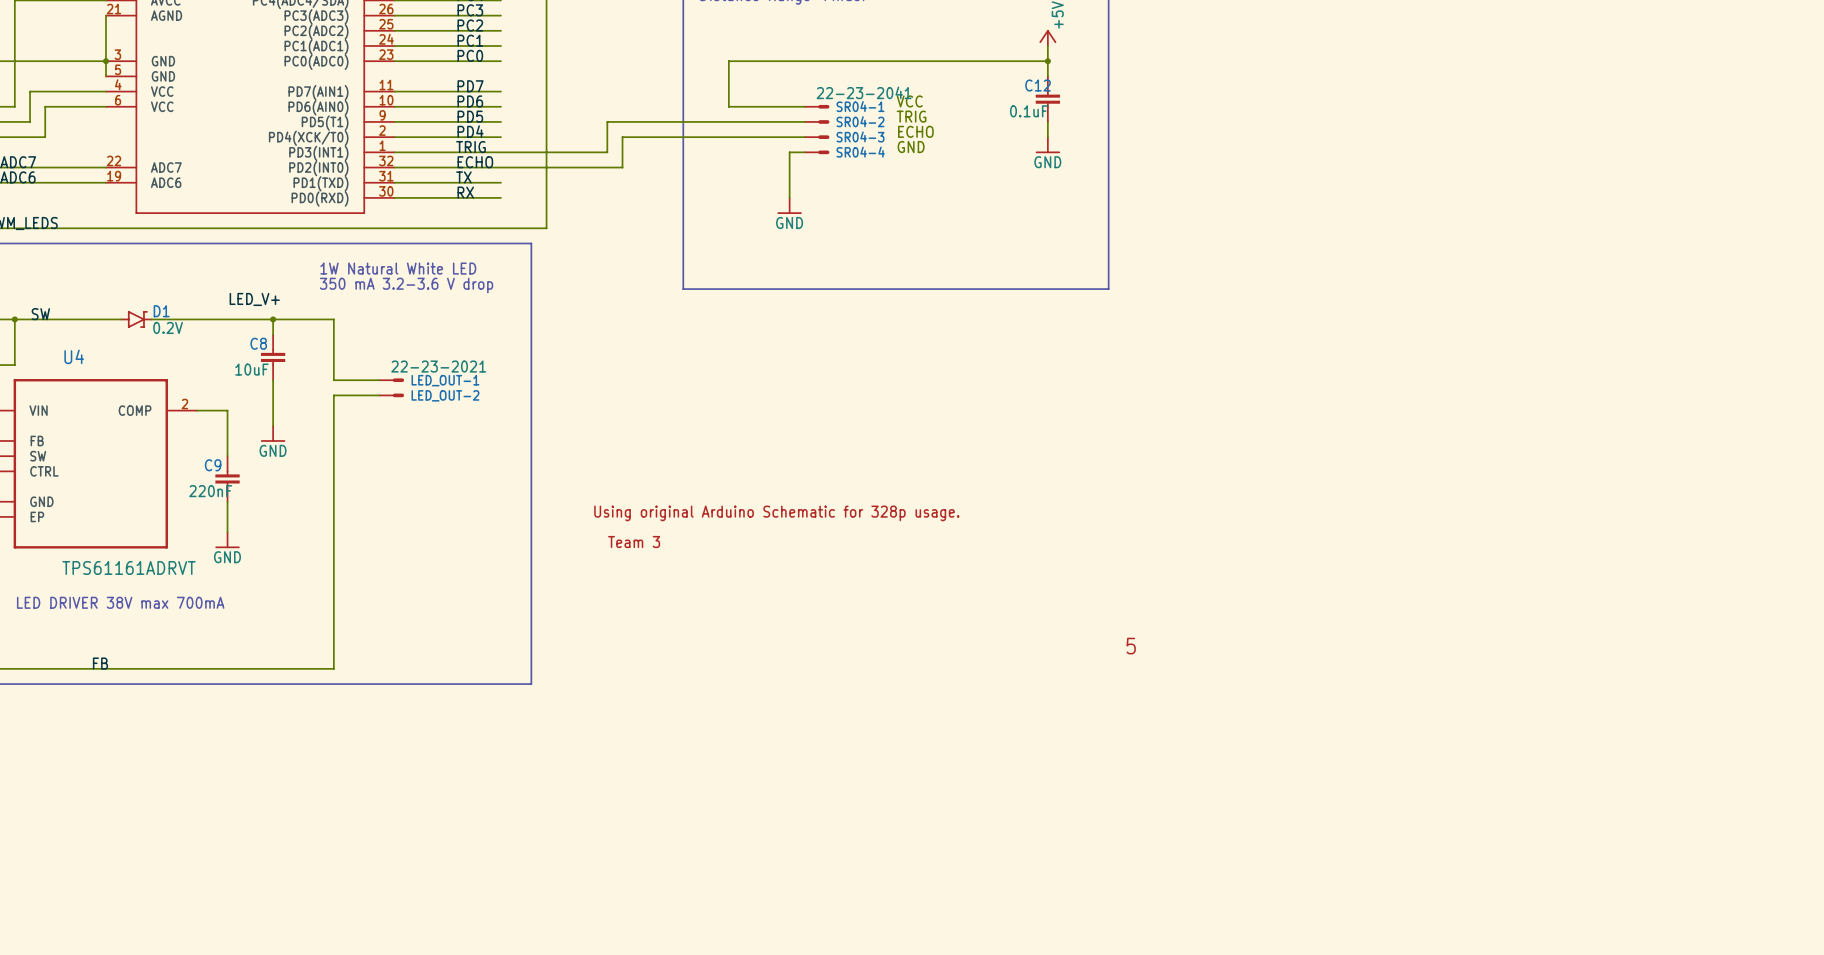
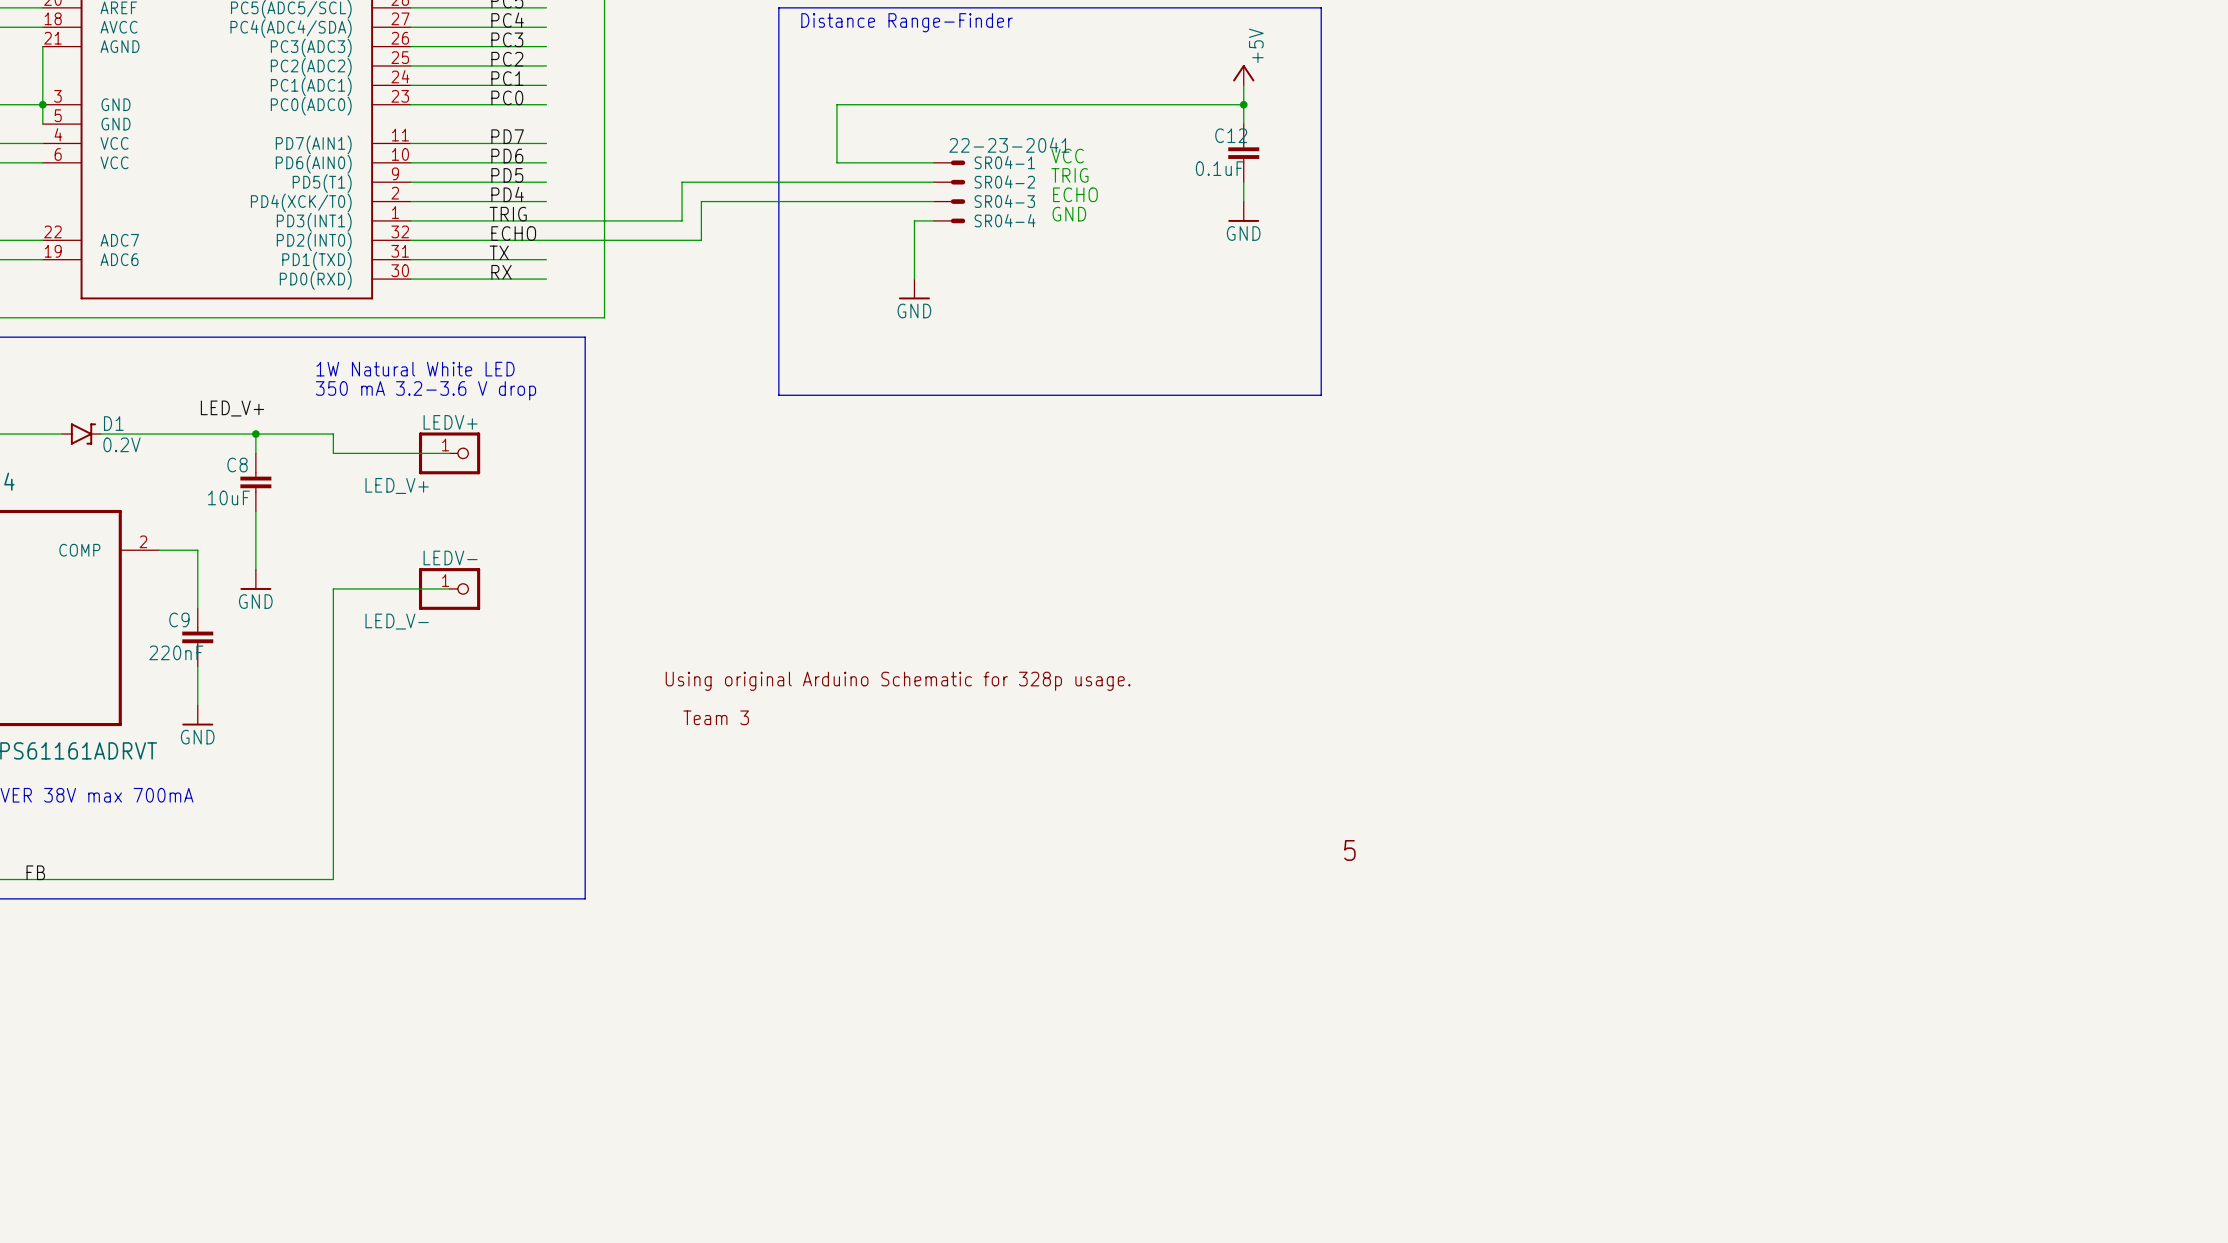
wire: (333, 334) (333, 380) (379, 380) -> (333, 453) (449, 453)
LEDV+: none -> LED_V+ (449, 453)
LED_OUT-1: 22-23-2021 (391, 380) -> none
wire: (379, 395) (333, 395) (333, 440) -> (449, 588) (333, 588)
LED_OUT-2: (391, 395) -> none
LEDV-: none -> LED_V- (449, 588)

